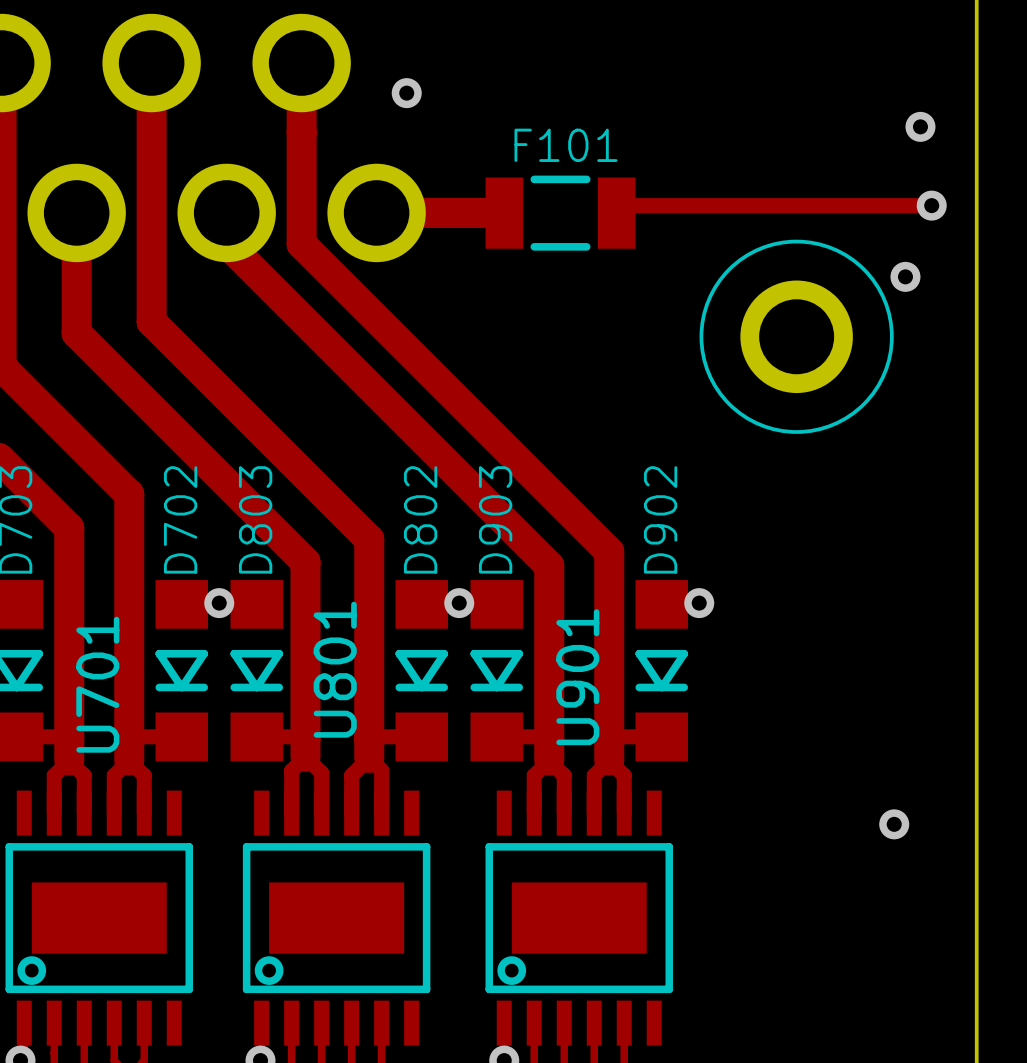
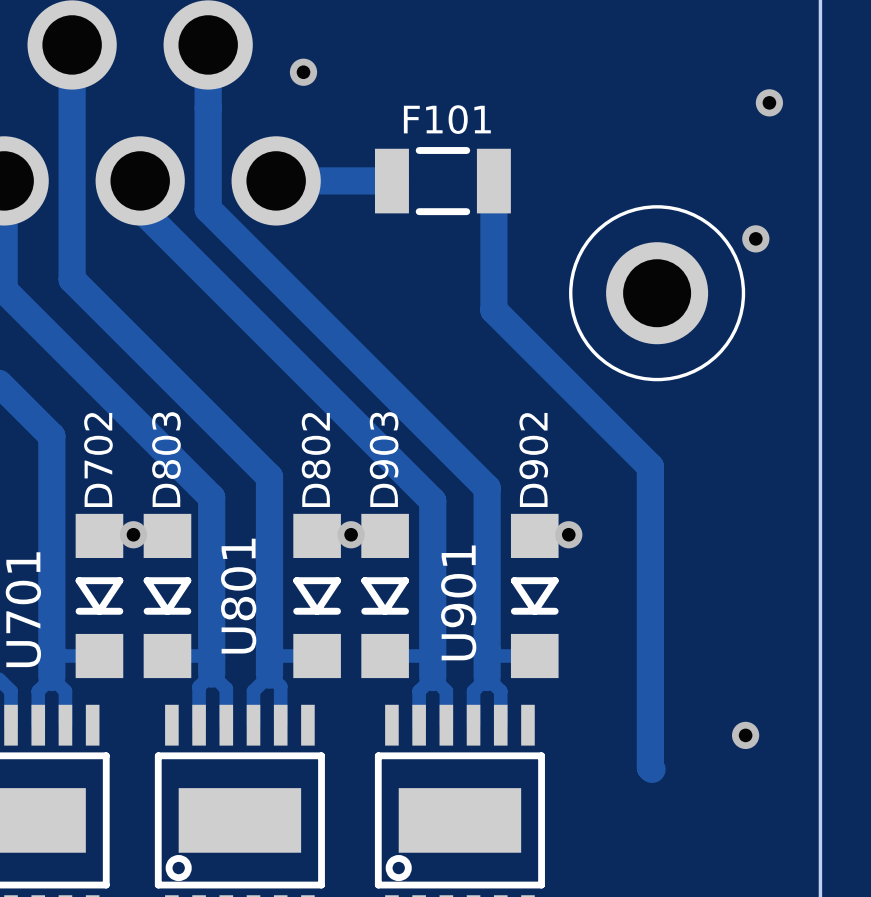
track: (931, 205) (624, 205) (616, 213) -> (652, 769) (650, 767) (650, 466) (493, 310) (493, 181)
via: (931, 205) -> none

